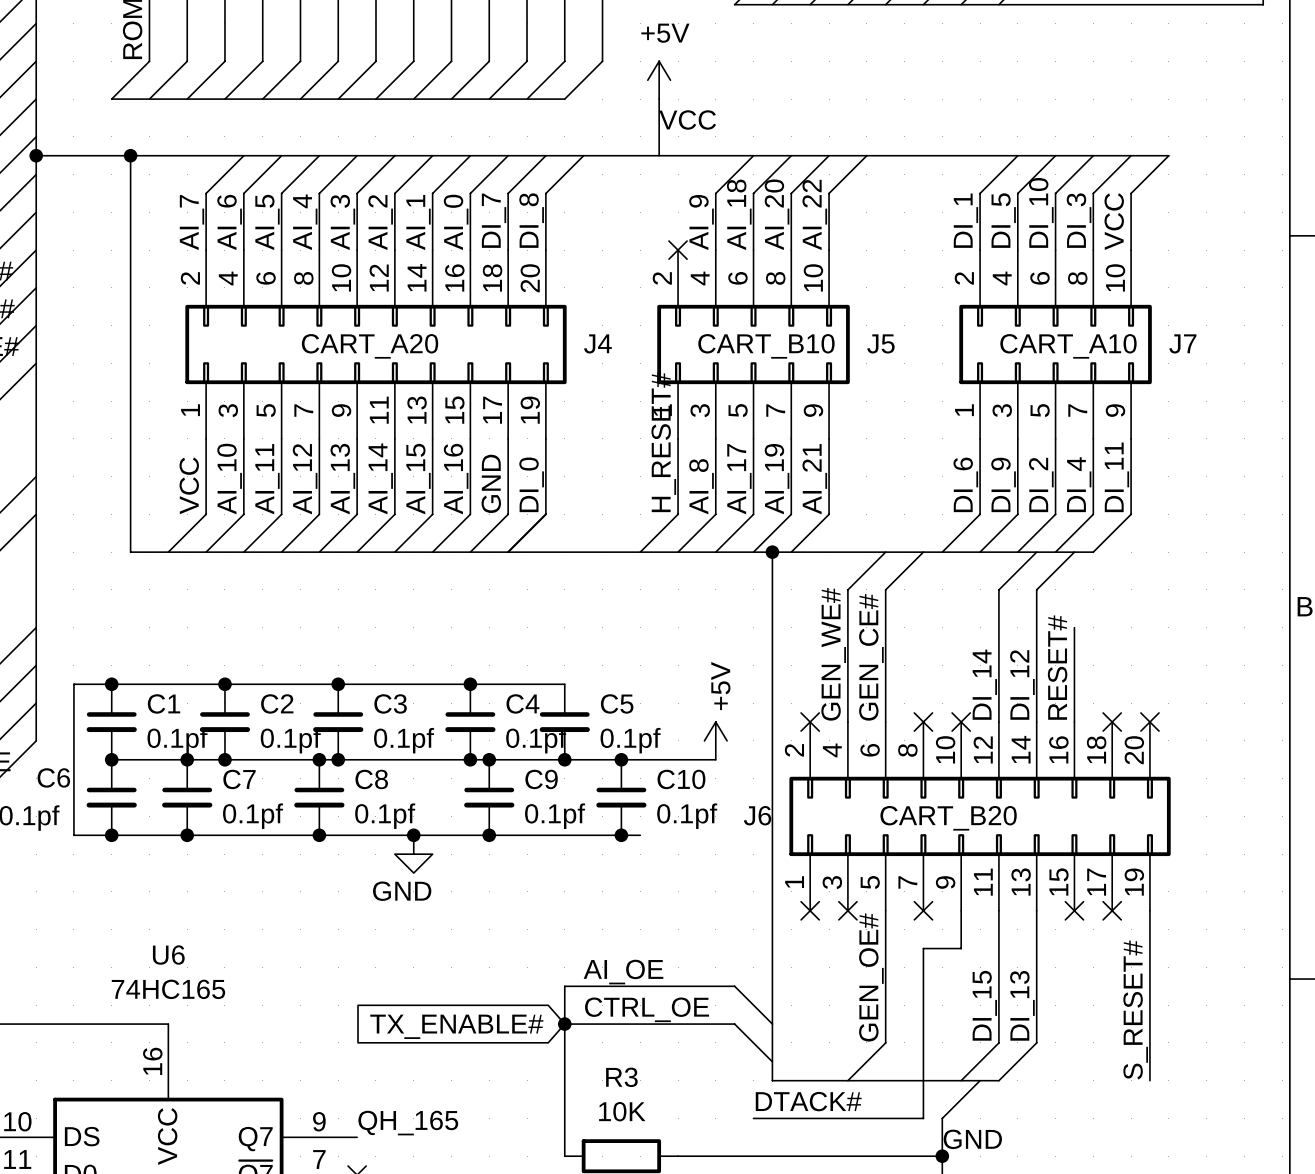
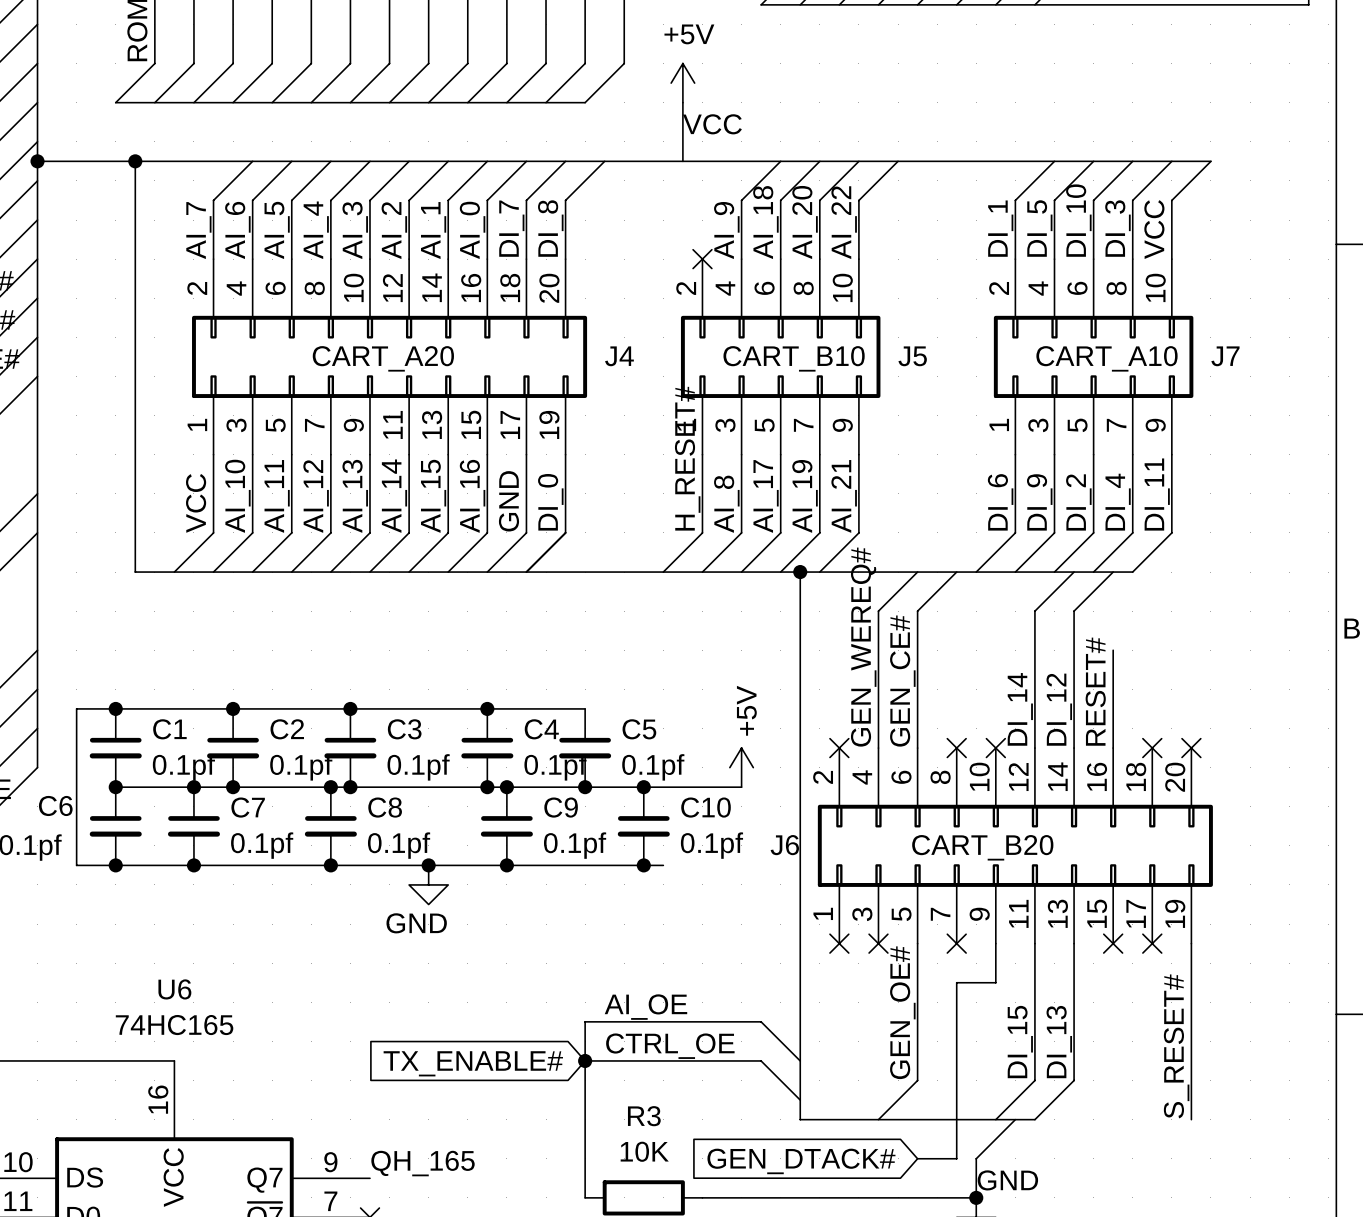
label: GEN_WE# (833, 654) -> GEN_WEREQ# (863, 647)
label: DTACK# (808, 1101) -> none
wire: (753, 1118) (885, 1118) -> none
global label: none -> GEN_DTACK# (801, 1161)

